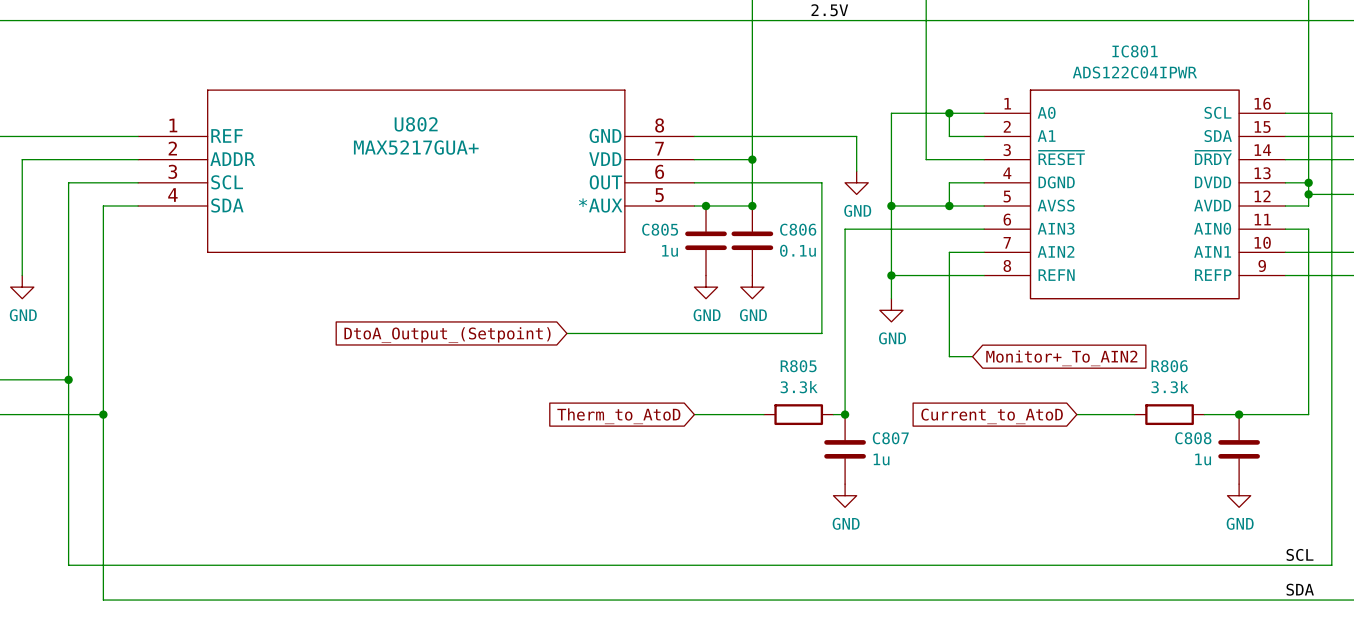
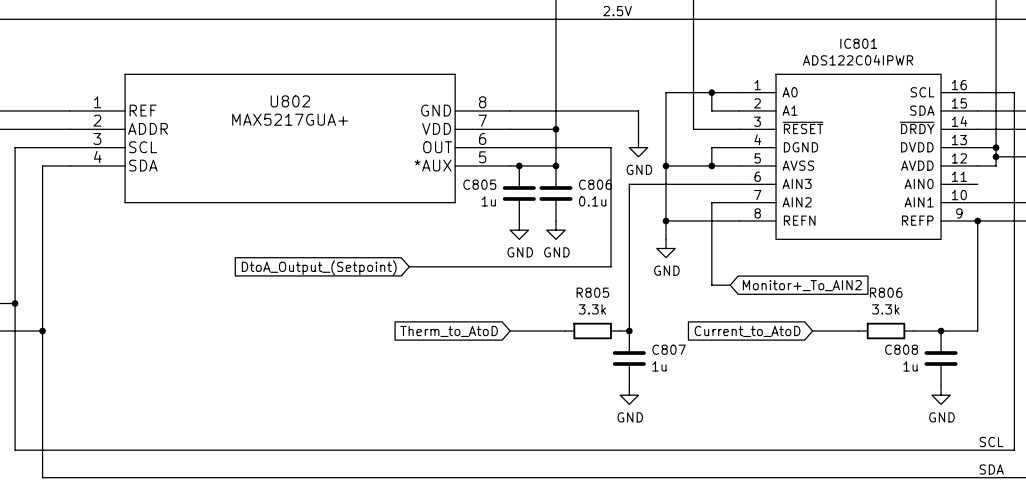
wire: (1285, 229) (1308, 229) (1308, 414) (1285, 414) -> (977, 220) (977, 331)
junction: none -> (977, 220)

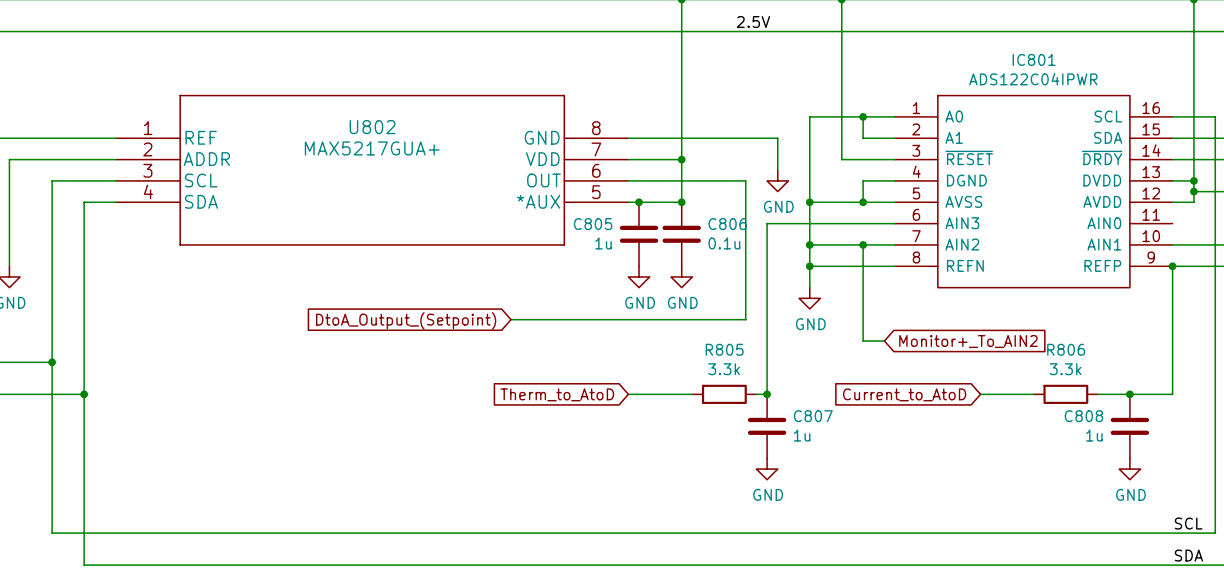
wire: none -> (809, 244) (863, 244)
junction: none -> (809, 244)
junction: none -> (863, 244)

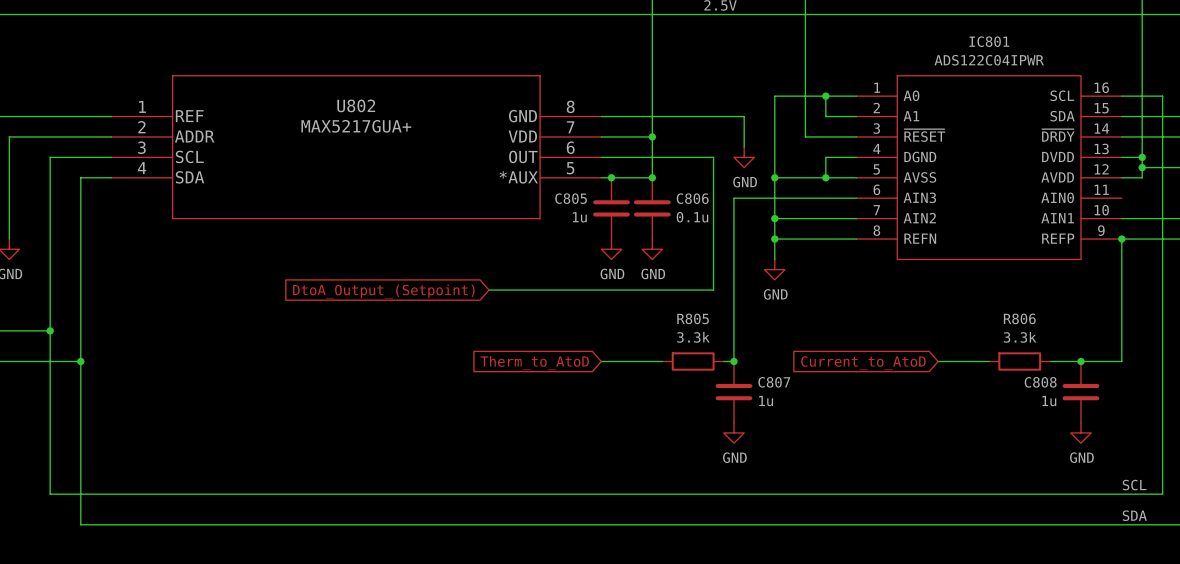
wire: (863, 244) (863, 341) (884, 341) -> none
junction: (863, 244) -> none
global label: Monitor+_To_AIN2 (968, 341) -> none

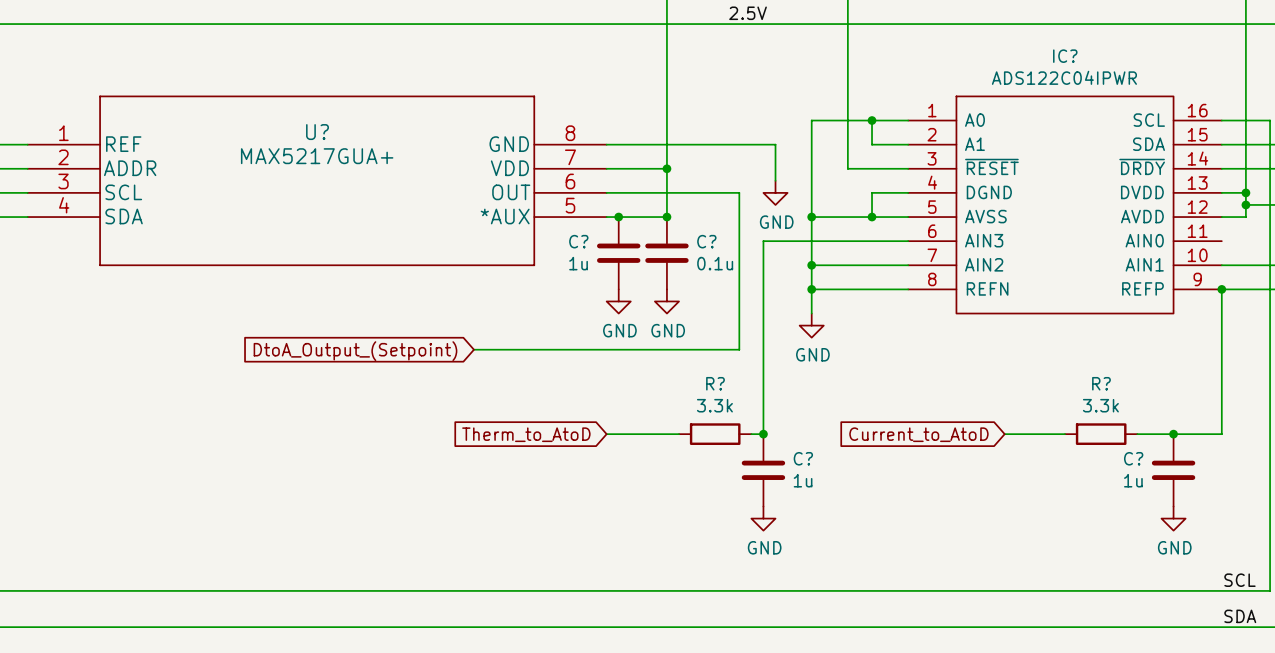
IC801 name: IC801 (989, 41) -> IC? (1065, 56)
U802 name: U802 (356, 105) -> U? (317, 132)
C805 name: C805 (571, 198) -> C? (578, 241)
C806 name: C806 (692, 198) -> C? (706, 241)
R805 name: R805 (693, 318) -> R? (715, 383)
R806 name: R806 (1019, 318) -> R? (1101, 383)
C807 name: C807 (774, 382) -> C? (803, 458)
C808 name: C808 (1040, 382) -> C? (1133, 458)

